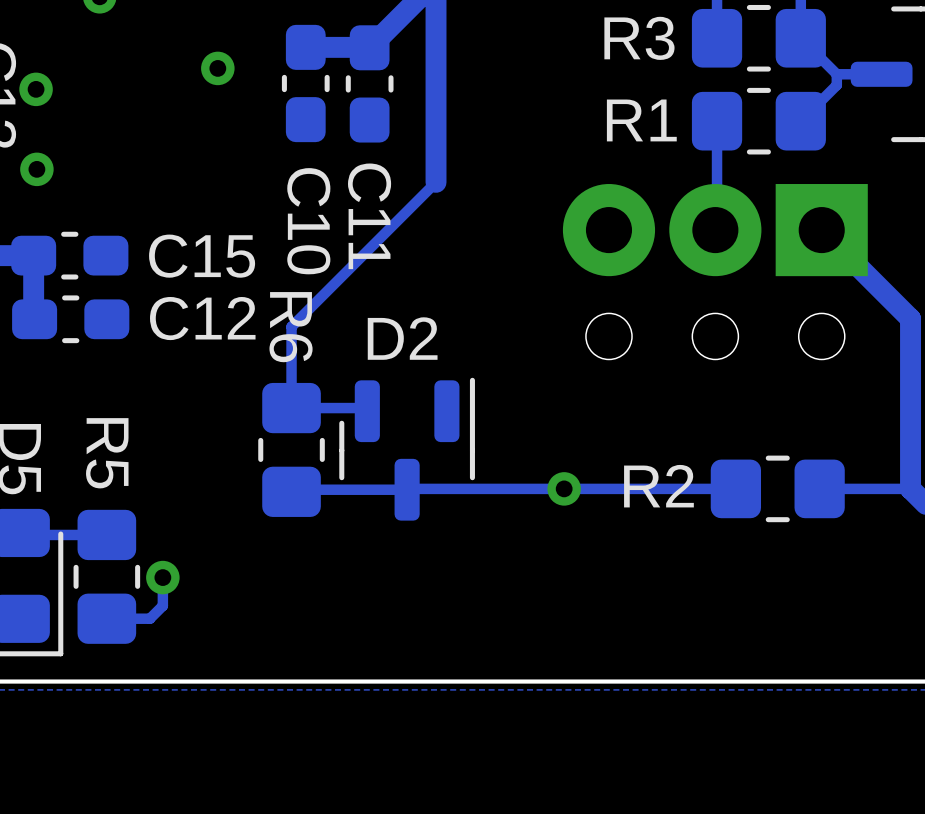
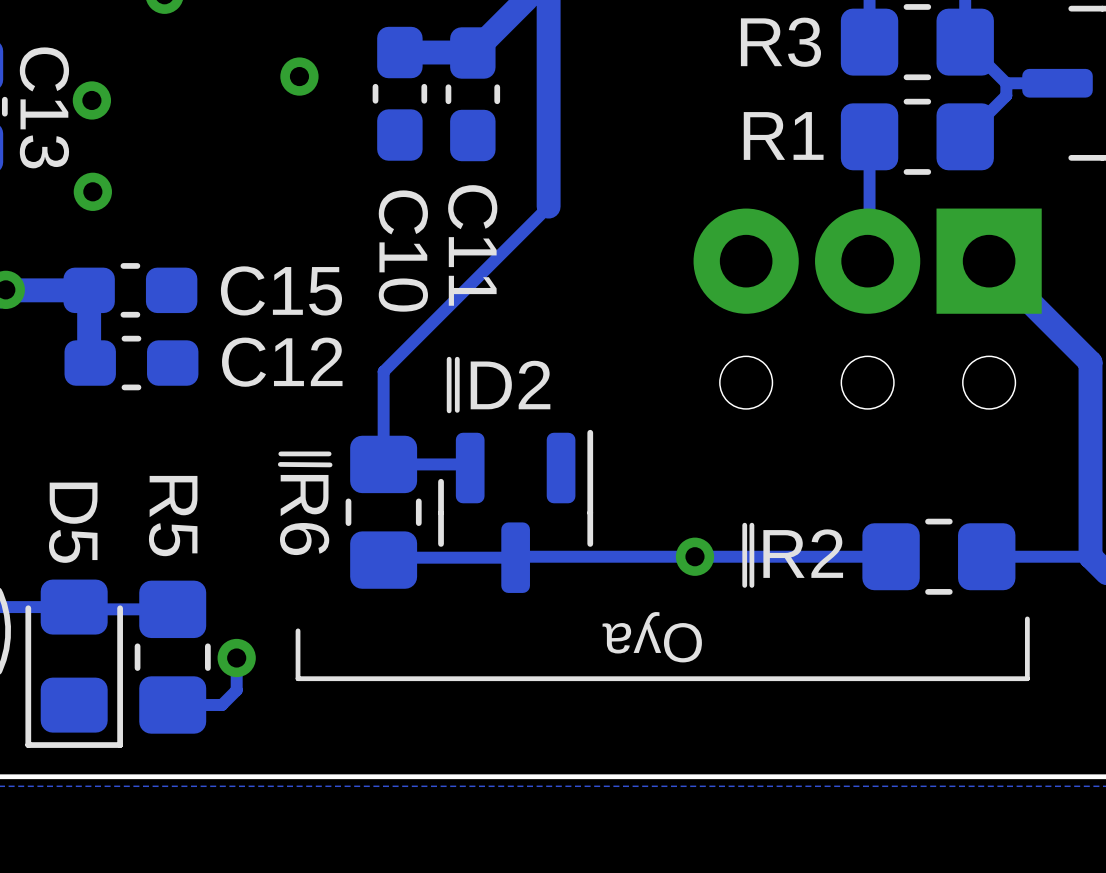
line: none -> (449, 359) (449, 410)
line: none -> (457, 359) (457, 410)
R6 name position: R6 (291, 327) -> R6 (304, 515)
line: none -> (329, 453) (280, 453)
line: none -> (280, 464) (330, 464)
line: none -> (744, 525) (744, 585)
line: none -> (751, 525) (751, 585)
line: none -> (1027, 618) (1027, 678) (298, 678) (298, 630)
text: none -> Oya (652, 637)

